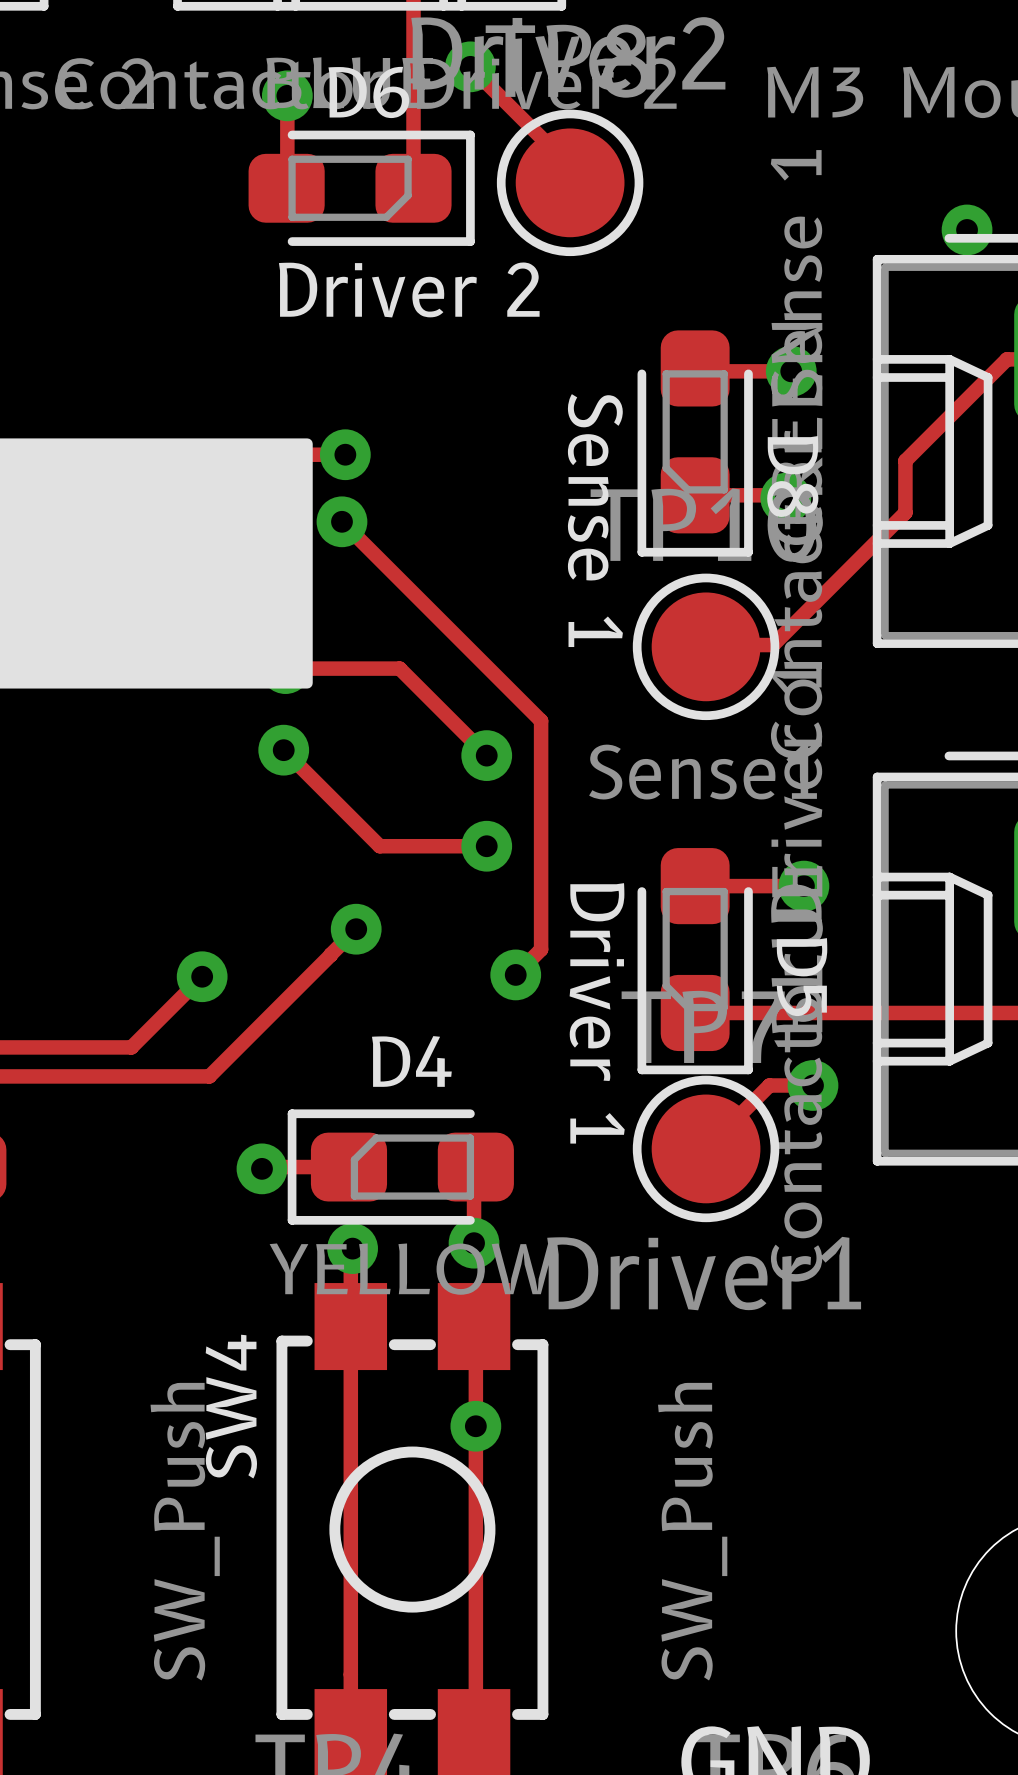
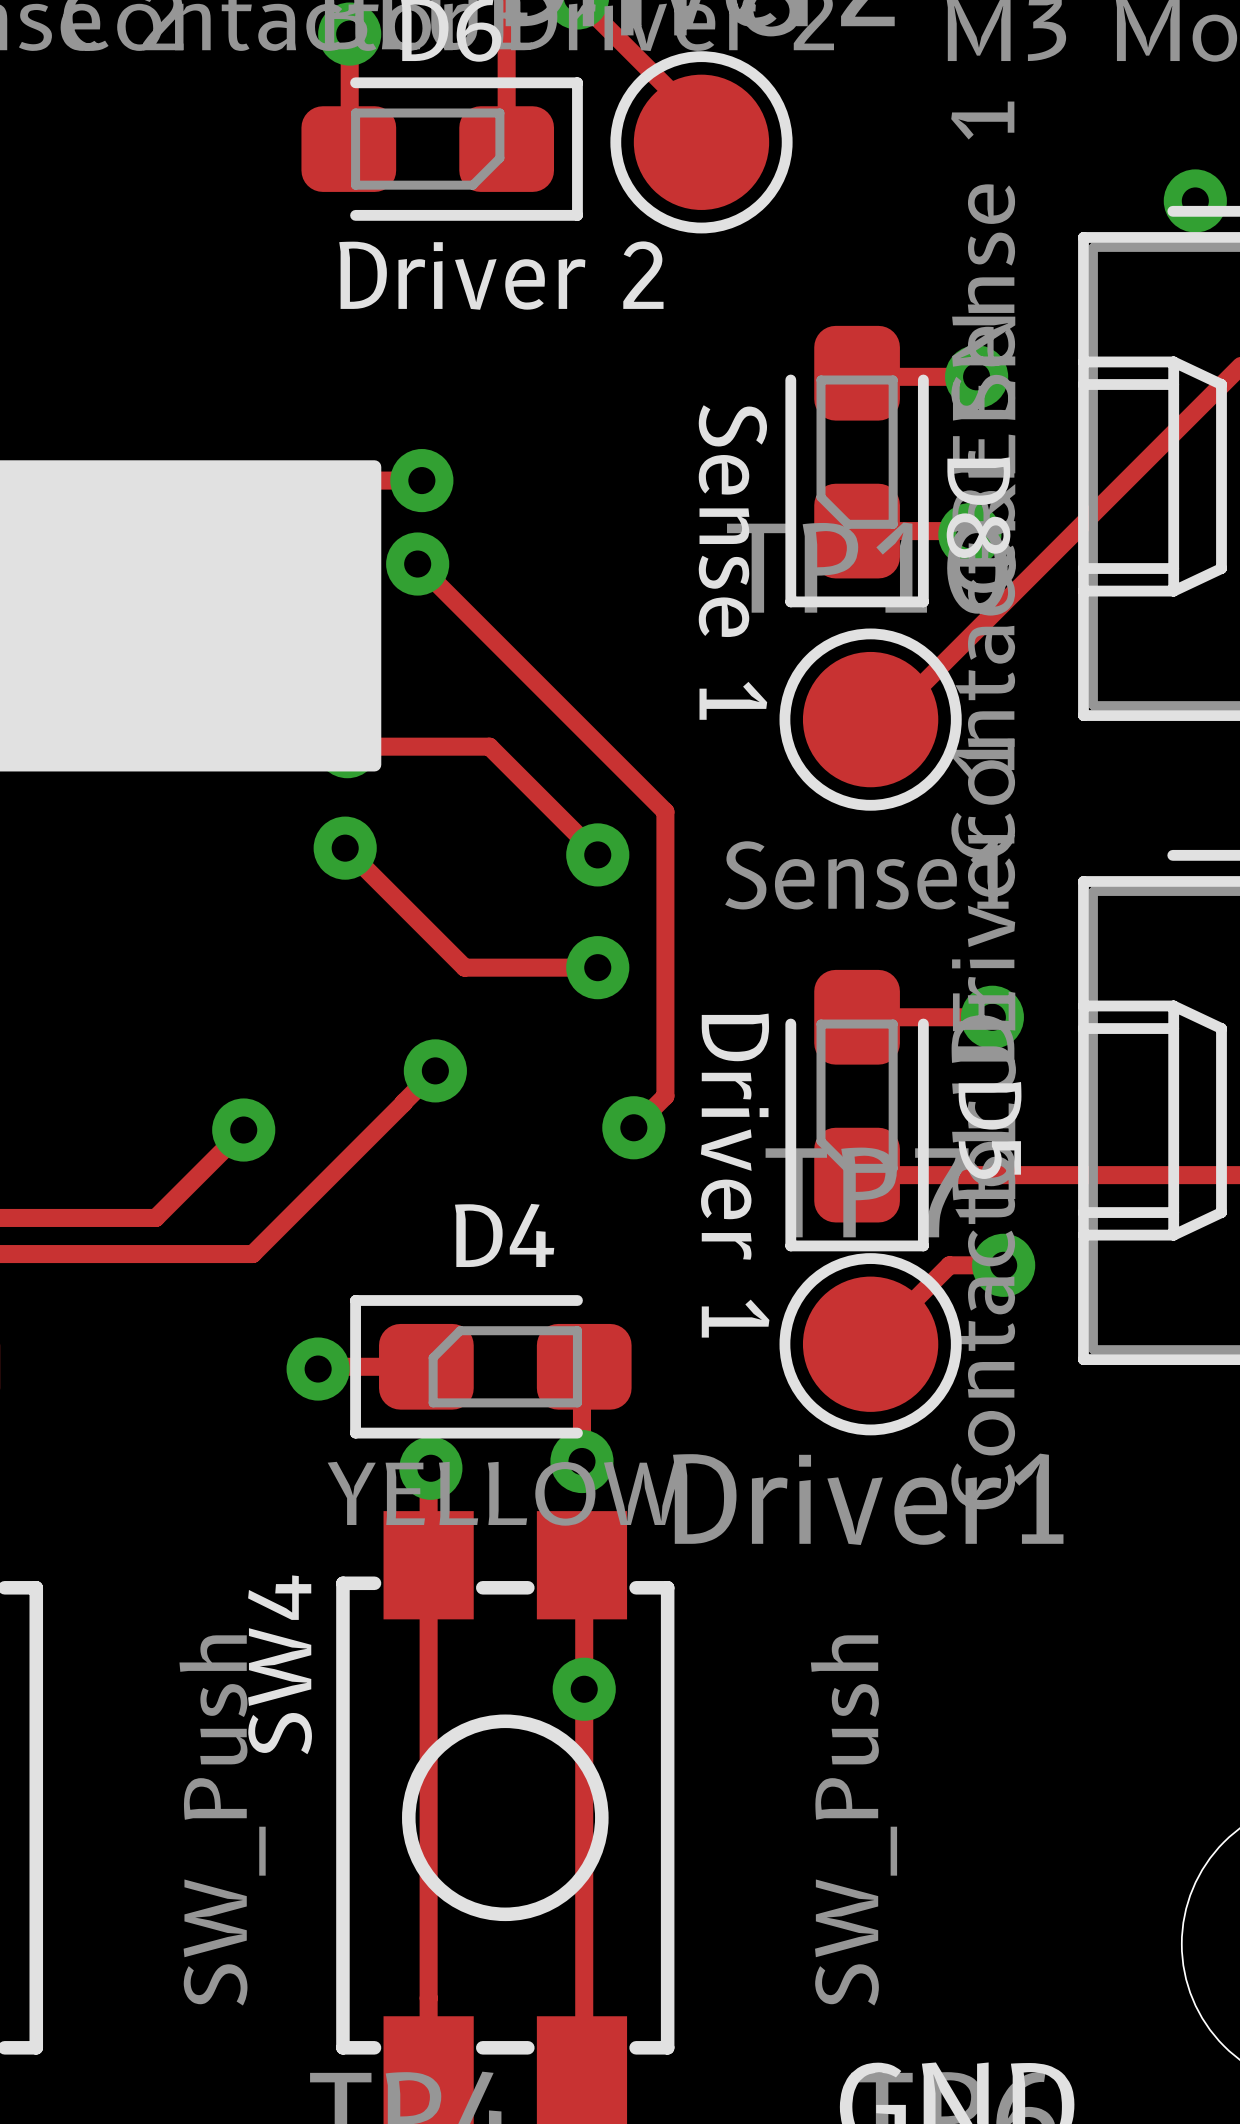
track: (905, 460) (905, 512) (773, 645) (704, 645) -> (1118, 488) (887, 719) (870, 719) (868, 717)

